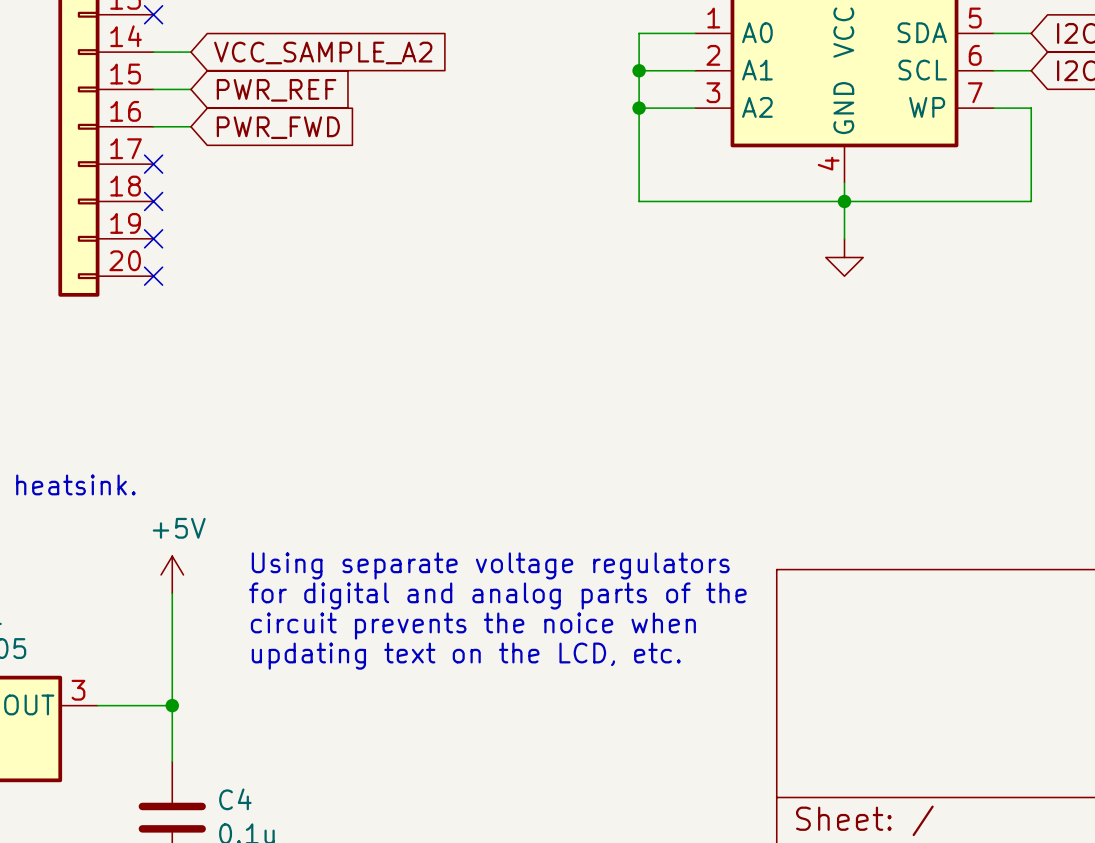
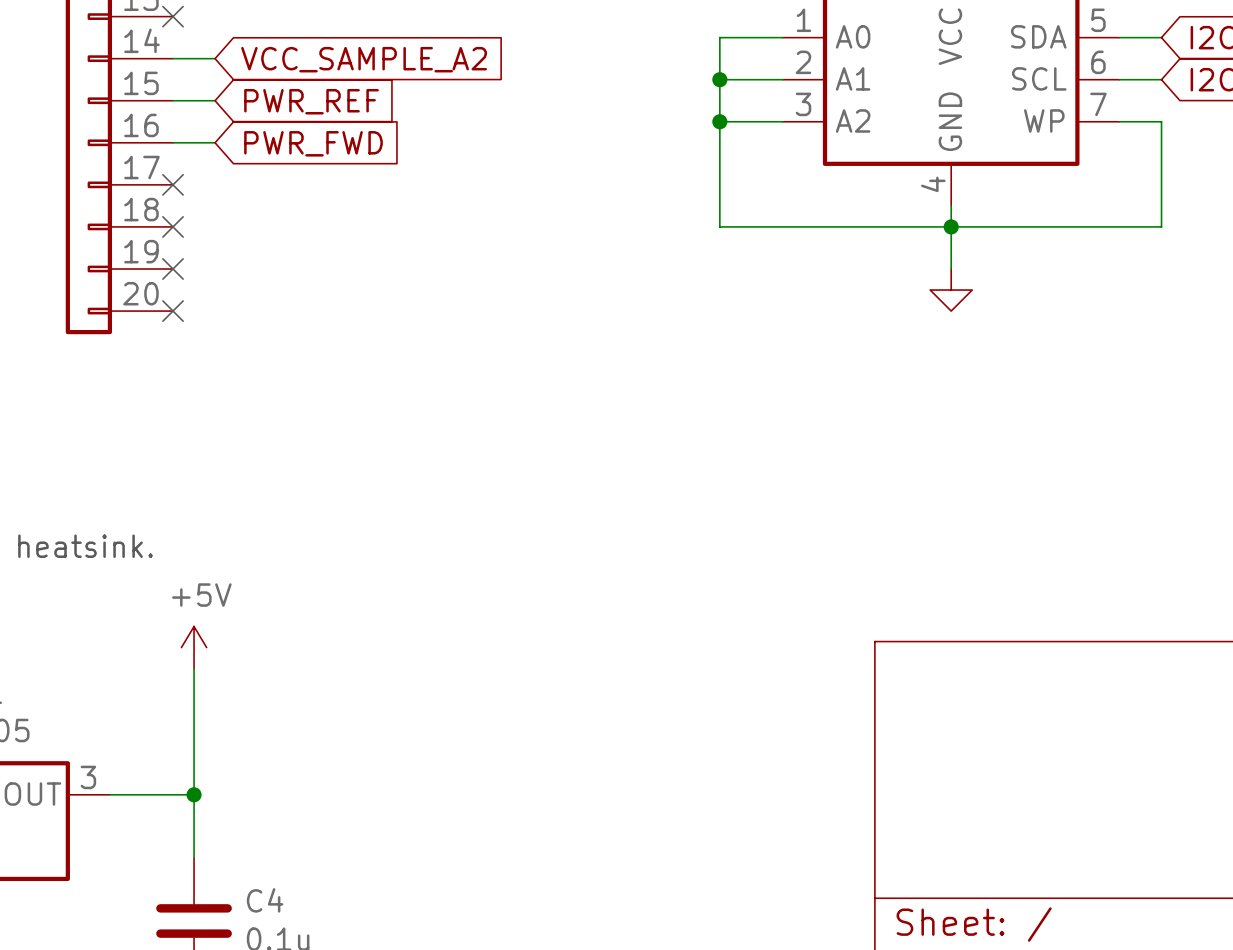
text: Using separate voltage regulators (490, 565) -> none
text: for digital and analog parts of the (497, 595) -> none
text: circuit prevents the noice when (473, 626) -> none
text: updating text on the LCD, etc. (466, 656) -> none

